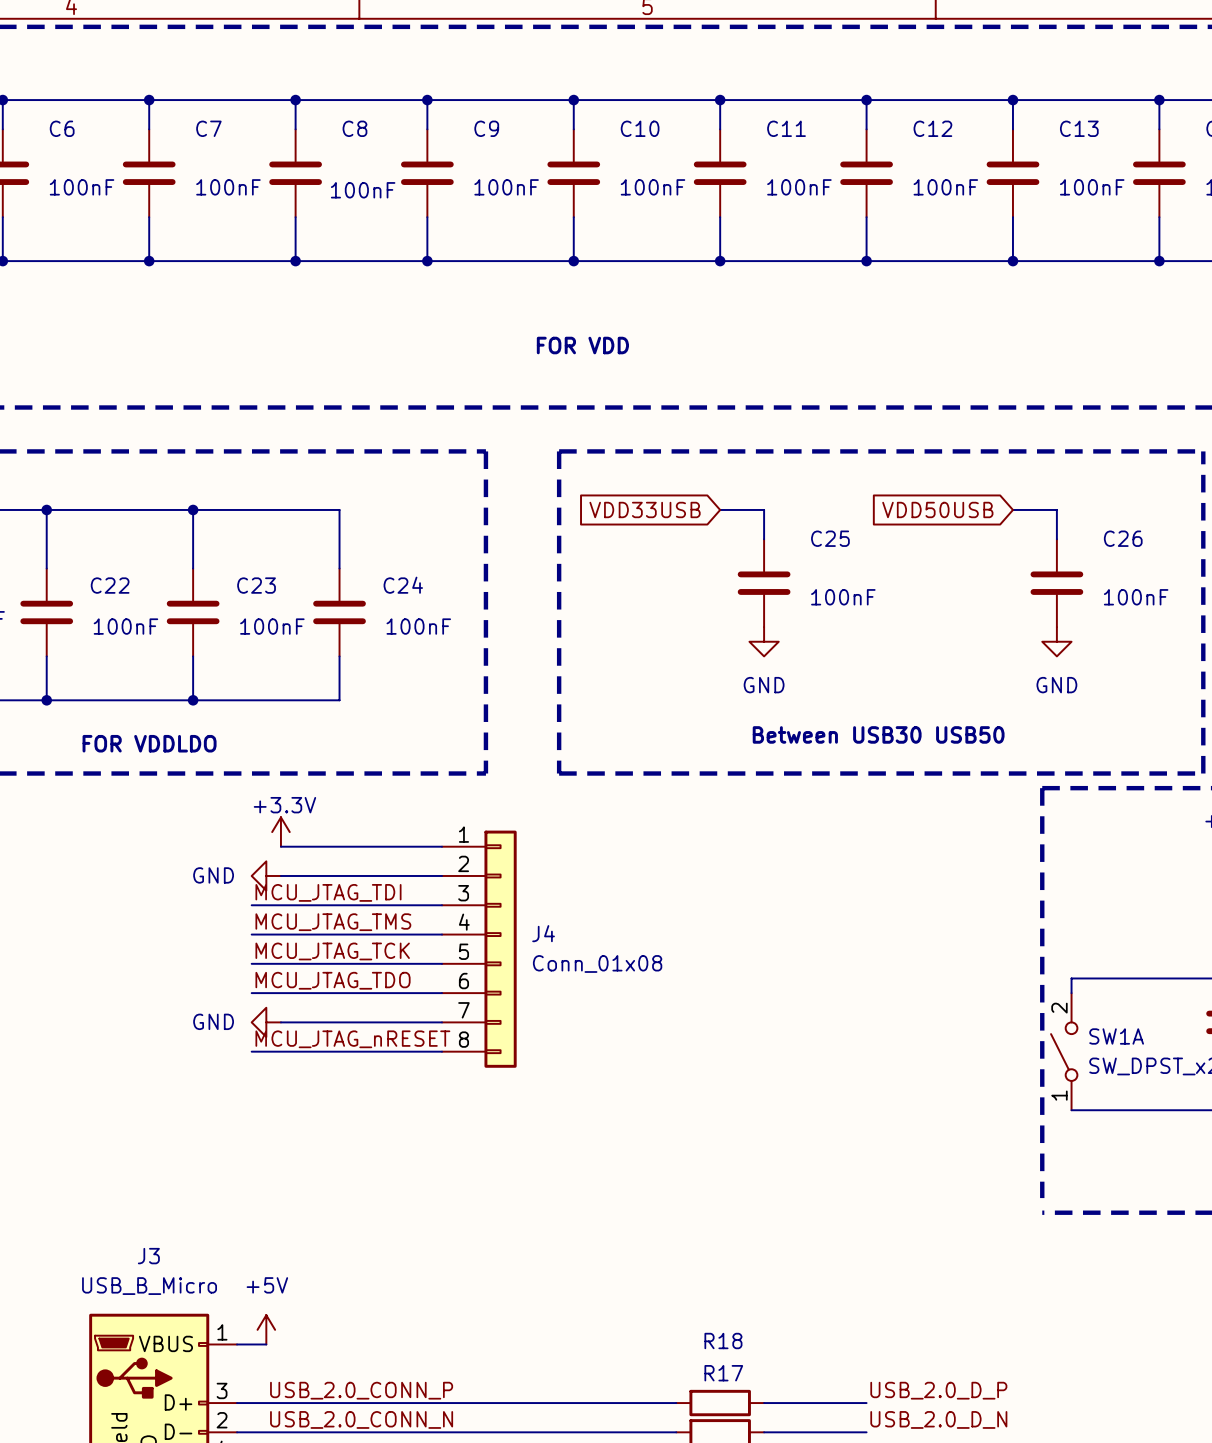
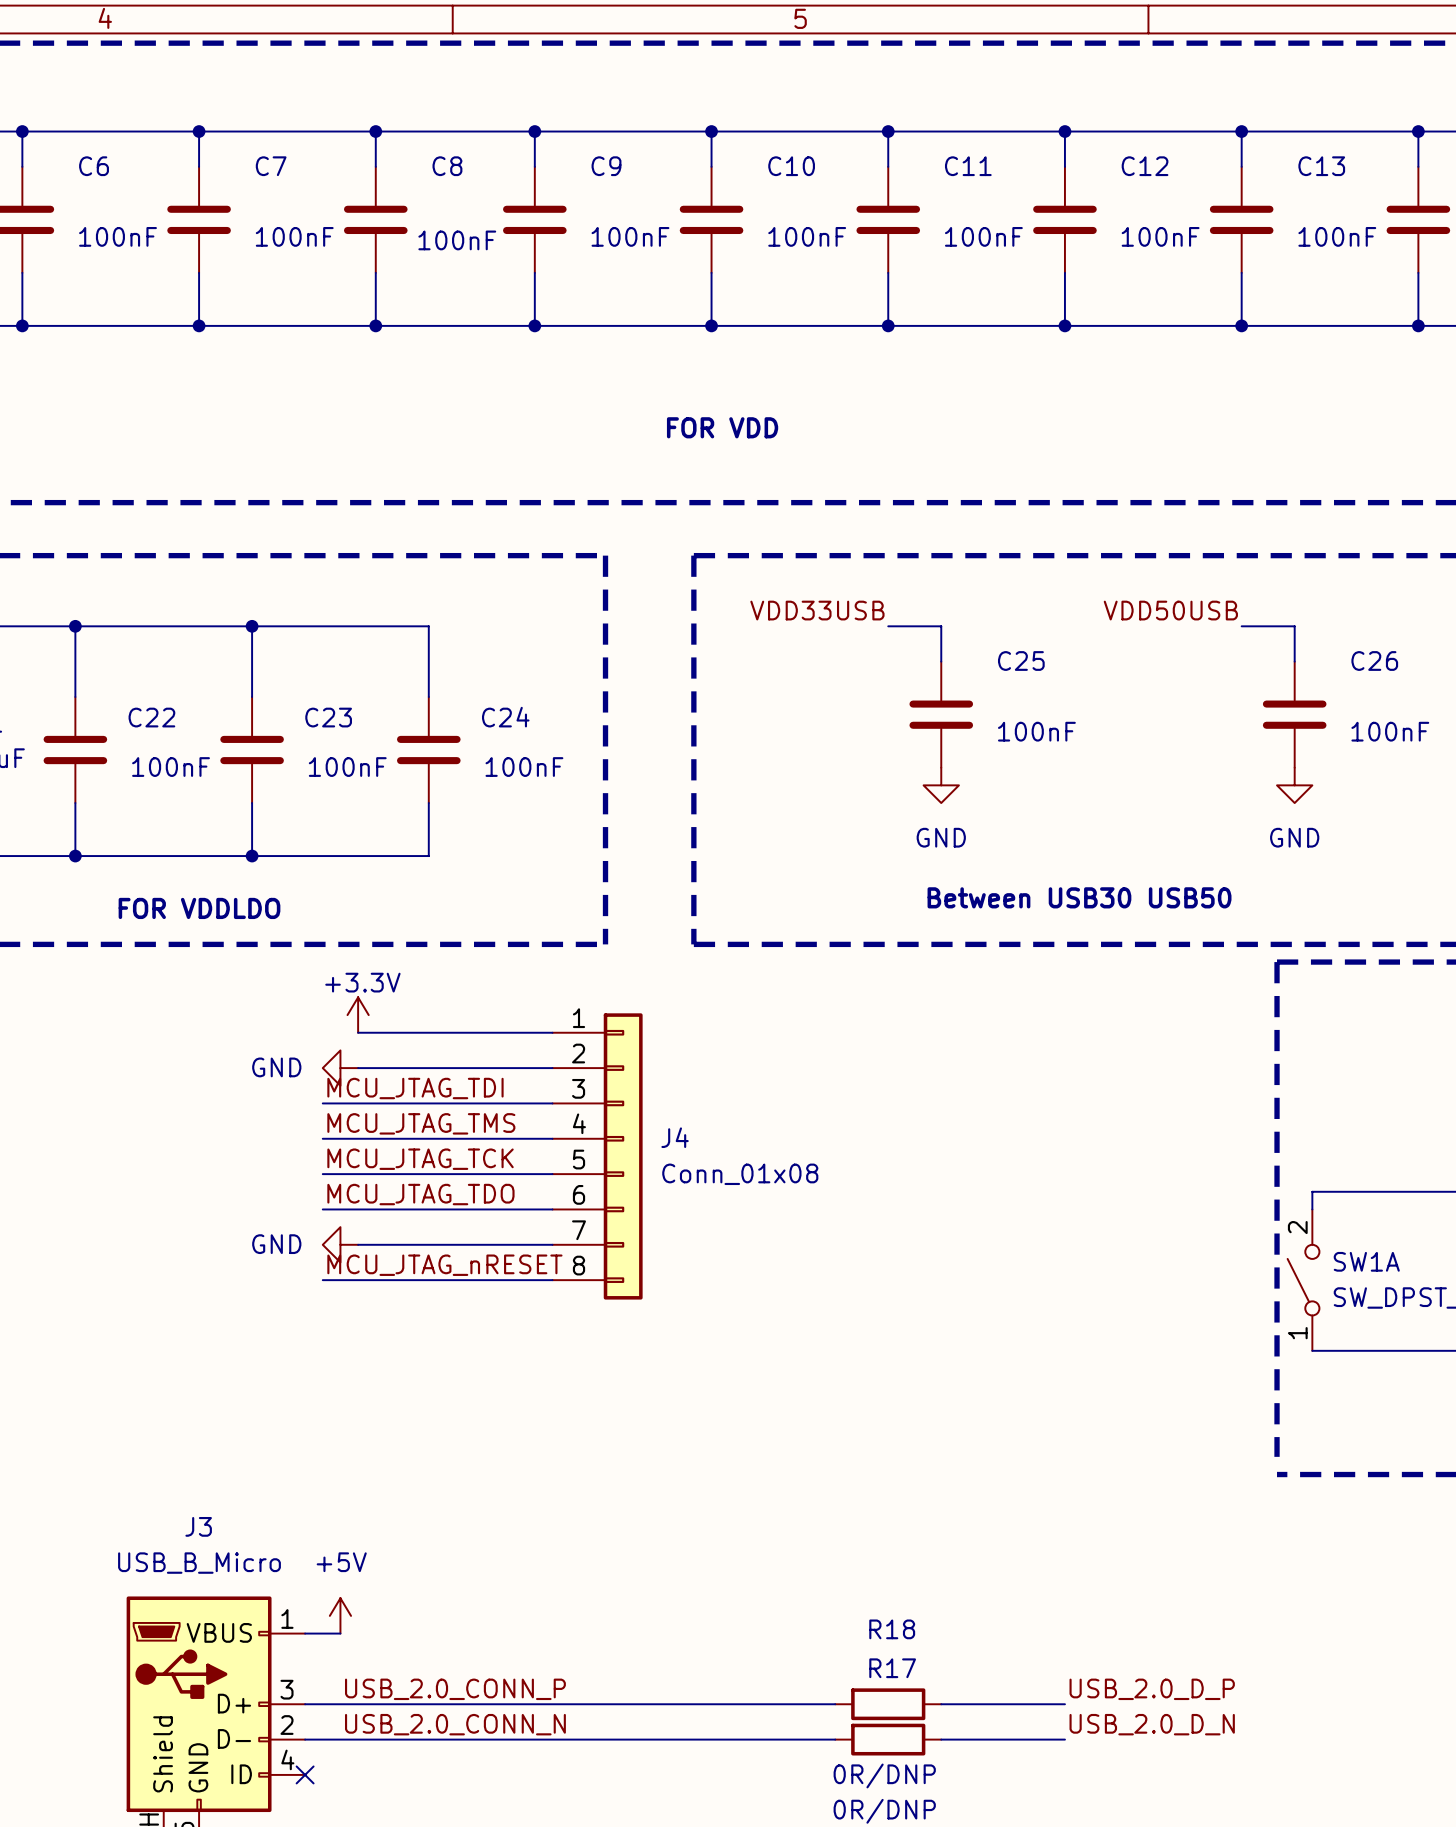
label: none -> VDD33USB (817, 610)
label: none -> VDD50USB (1170, 610)
global label: VDD33USB (645, 509) -> none
global label: VDD50USB (937, 509) -> none

